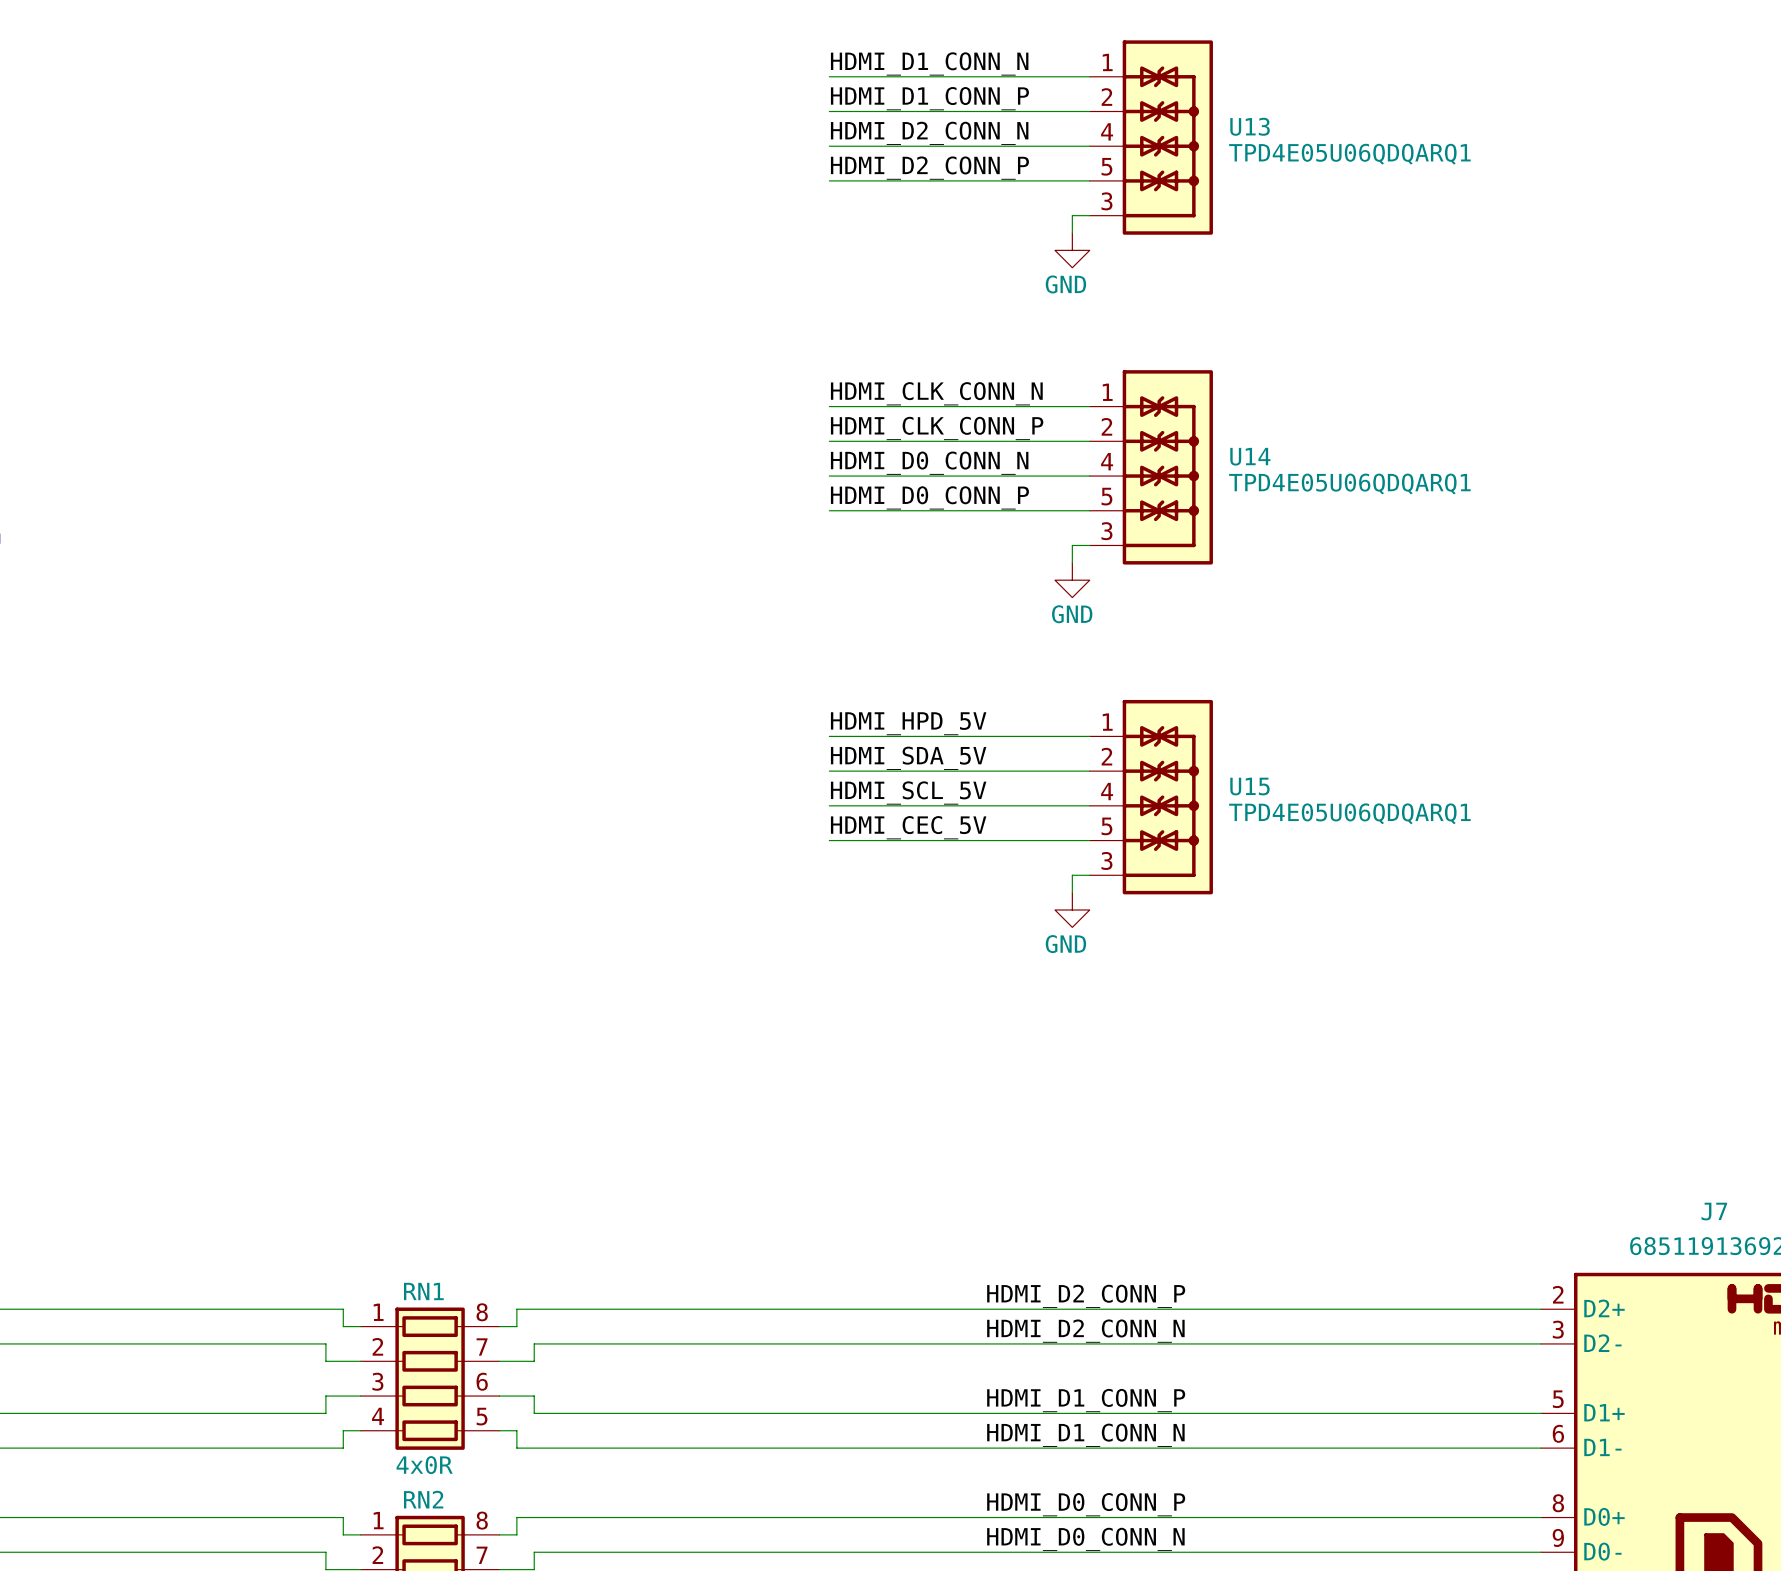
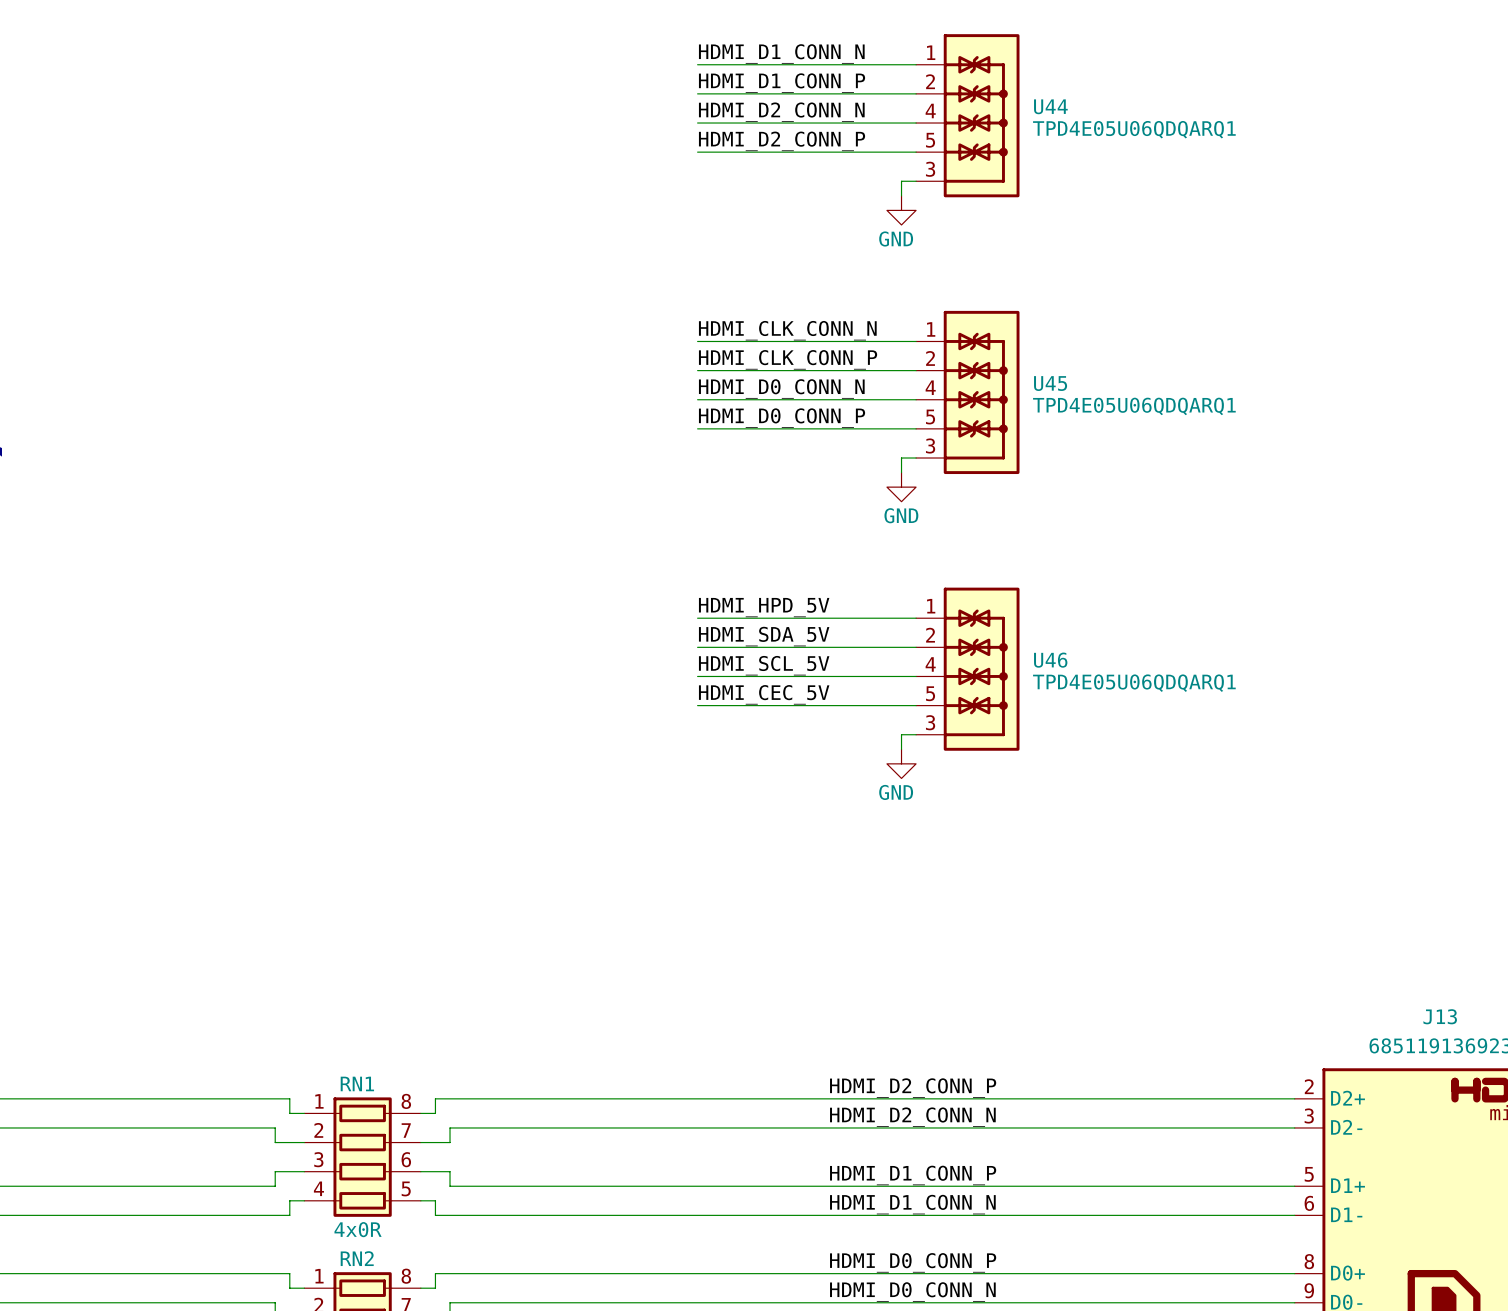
U13 name: U13 (1250, 126) -> U44 (1050, 106)
U14 name: U14 (1250, 456) -> U45 (1050, 383)
U15 name: U15 (1249, 786) -> U46 (1050, 660)
J7 name: J7 (1714, 1211) -> J13 (1440, 1016)

